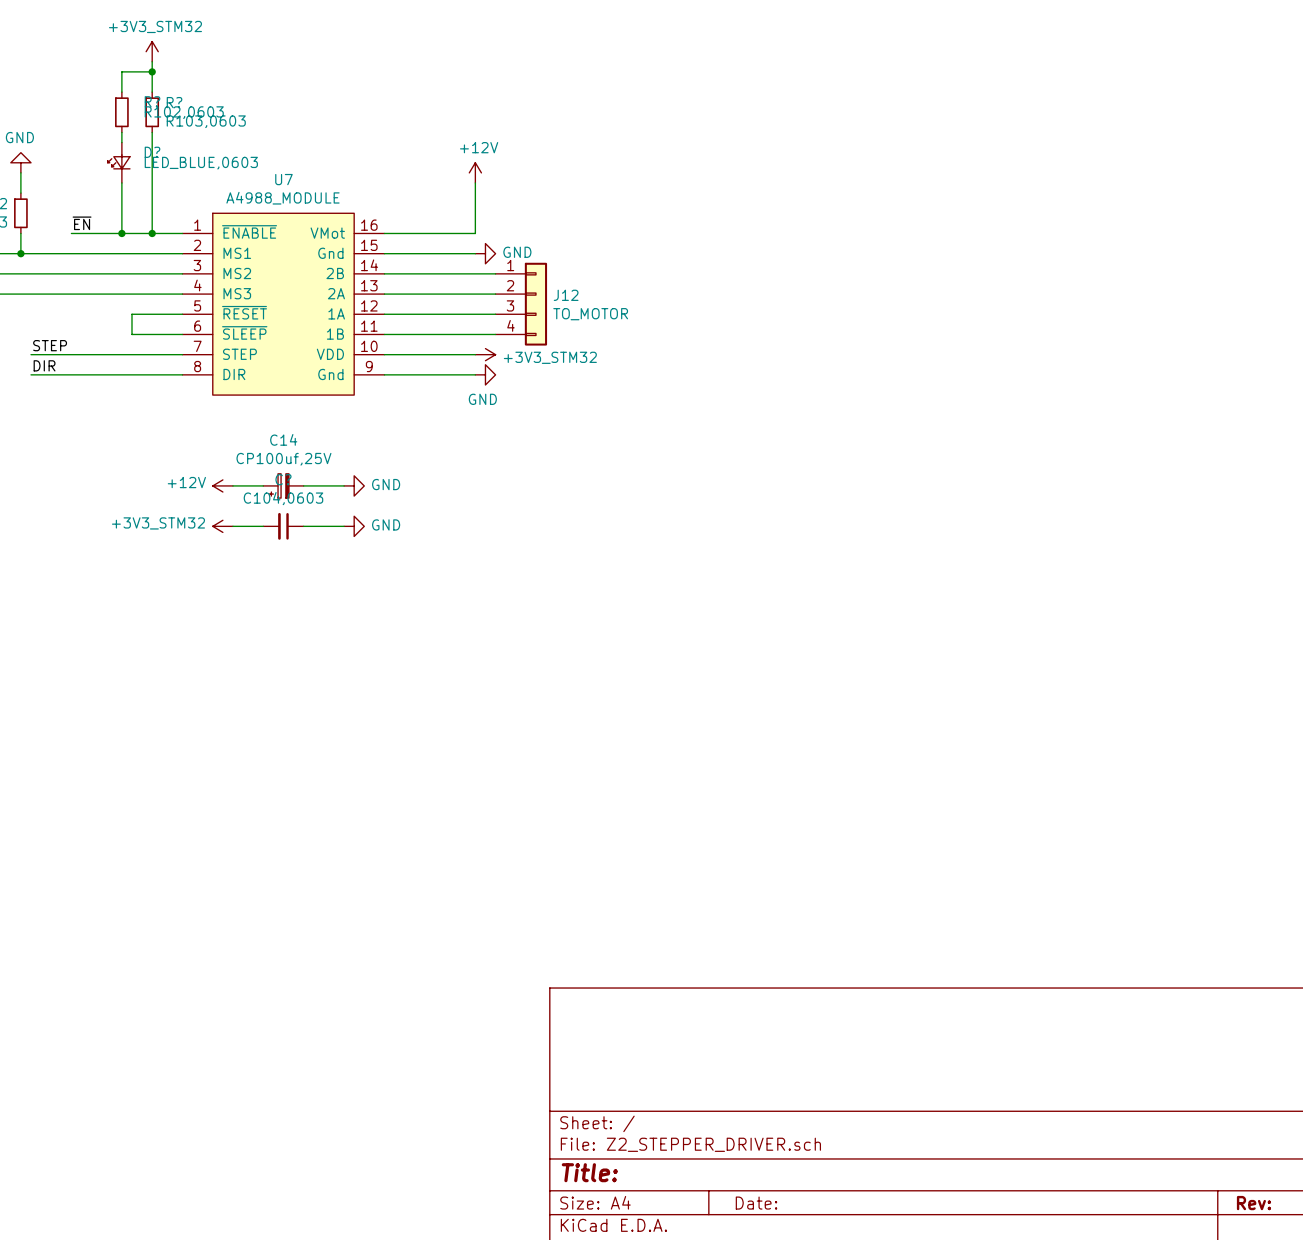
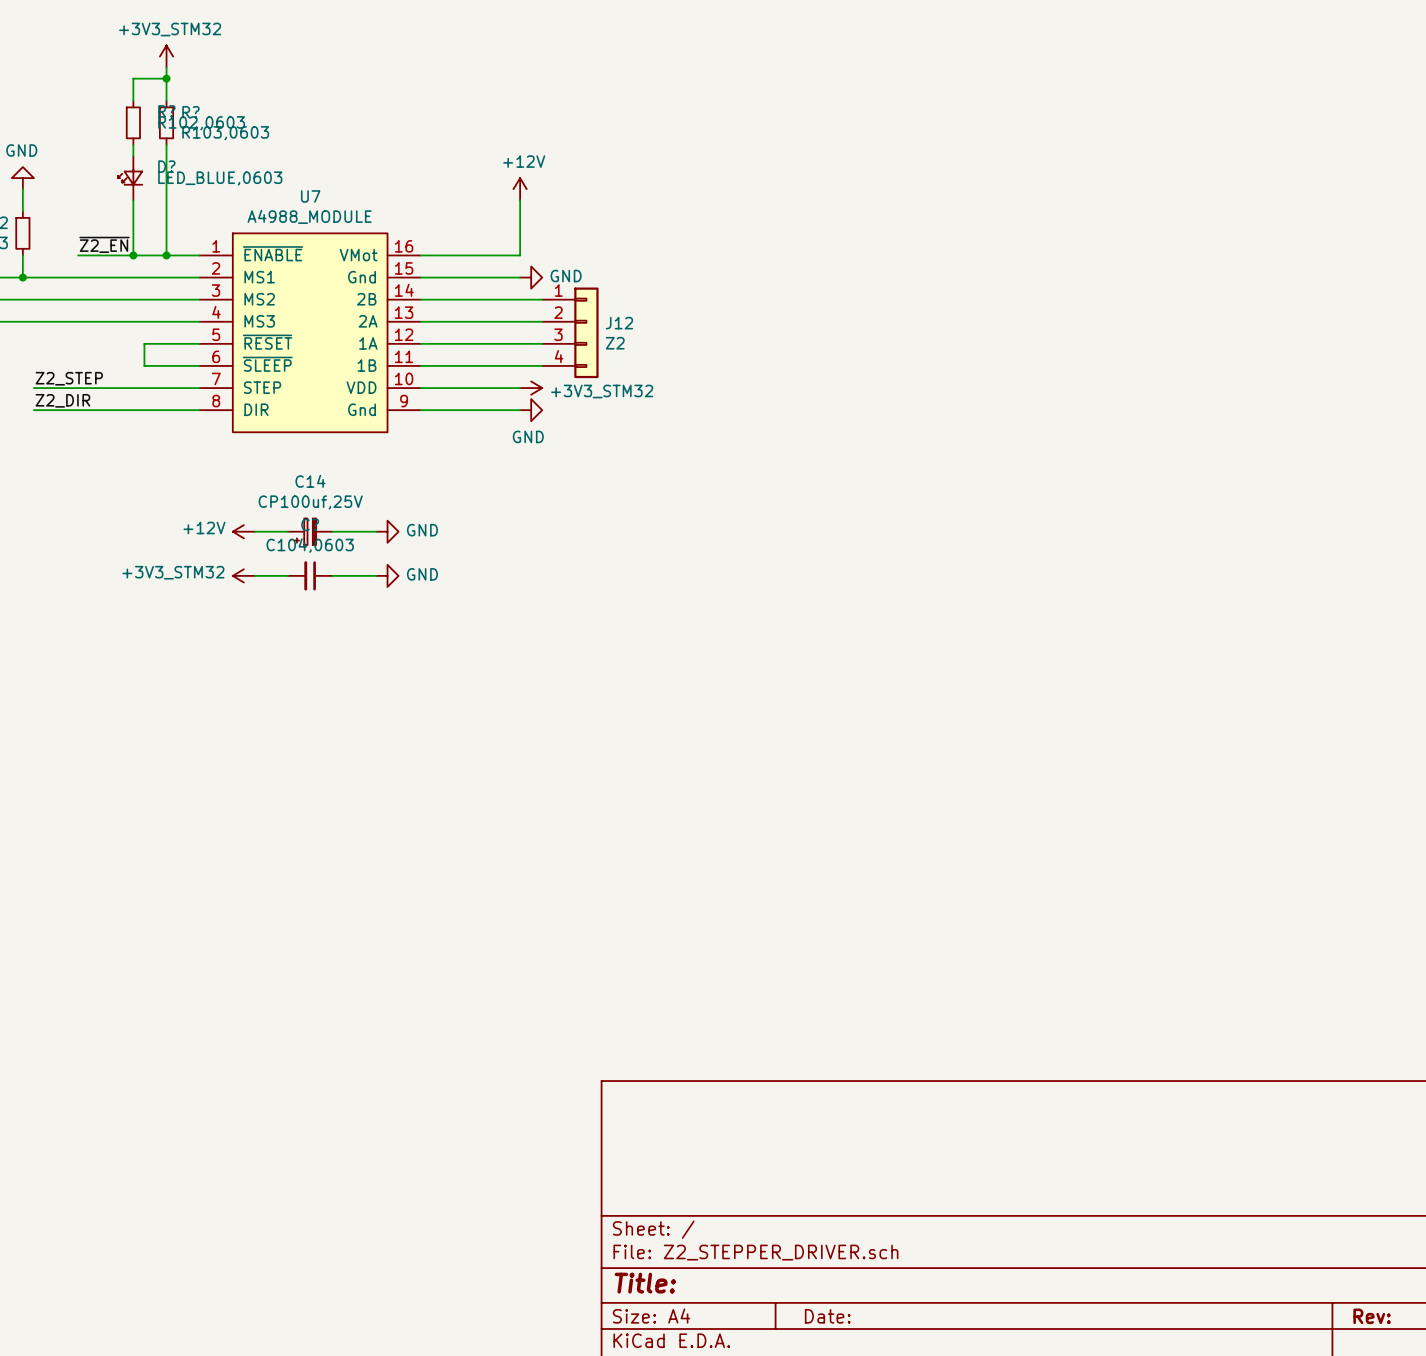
label: ~{EN} (82, 223) -> ~{Z2_EN} (104, 244)
J12 value: TO_MOTOR (590, 314) -> Z2 (615, 343)
label: STEP (50, 345) -> Z2_STEP (69, 378)
label: DIR (44, 365) -> Z2_DIR (62, 400)

